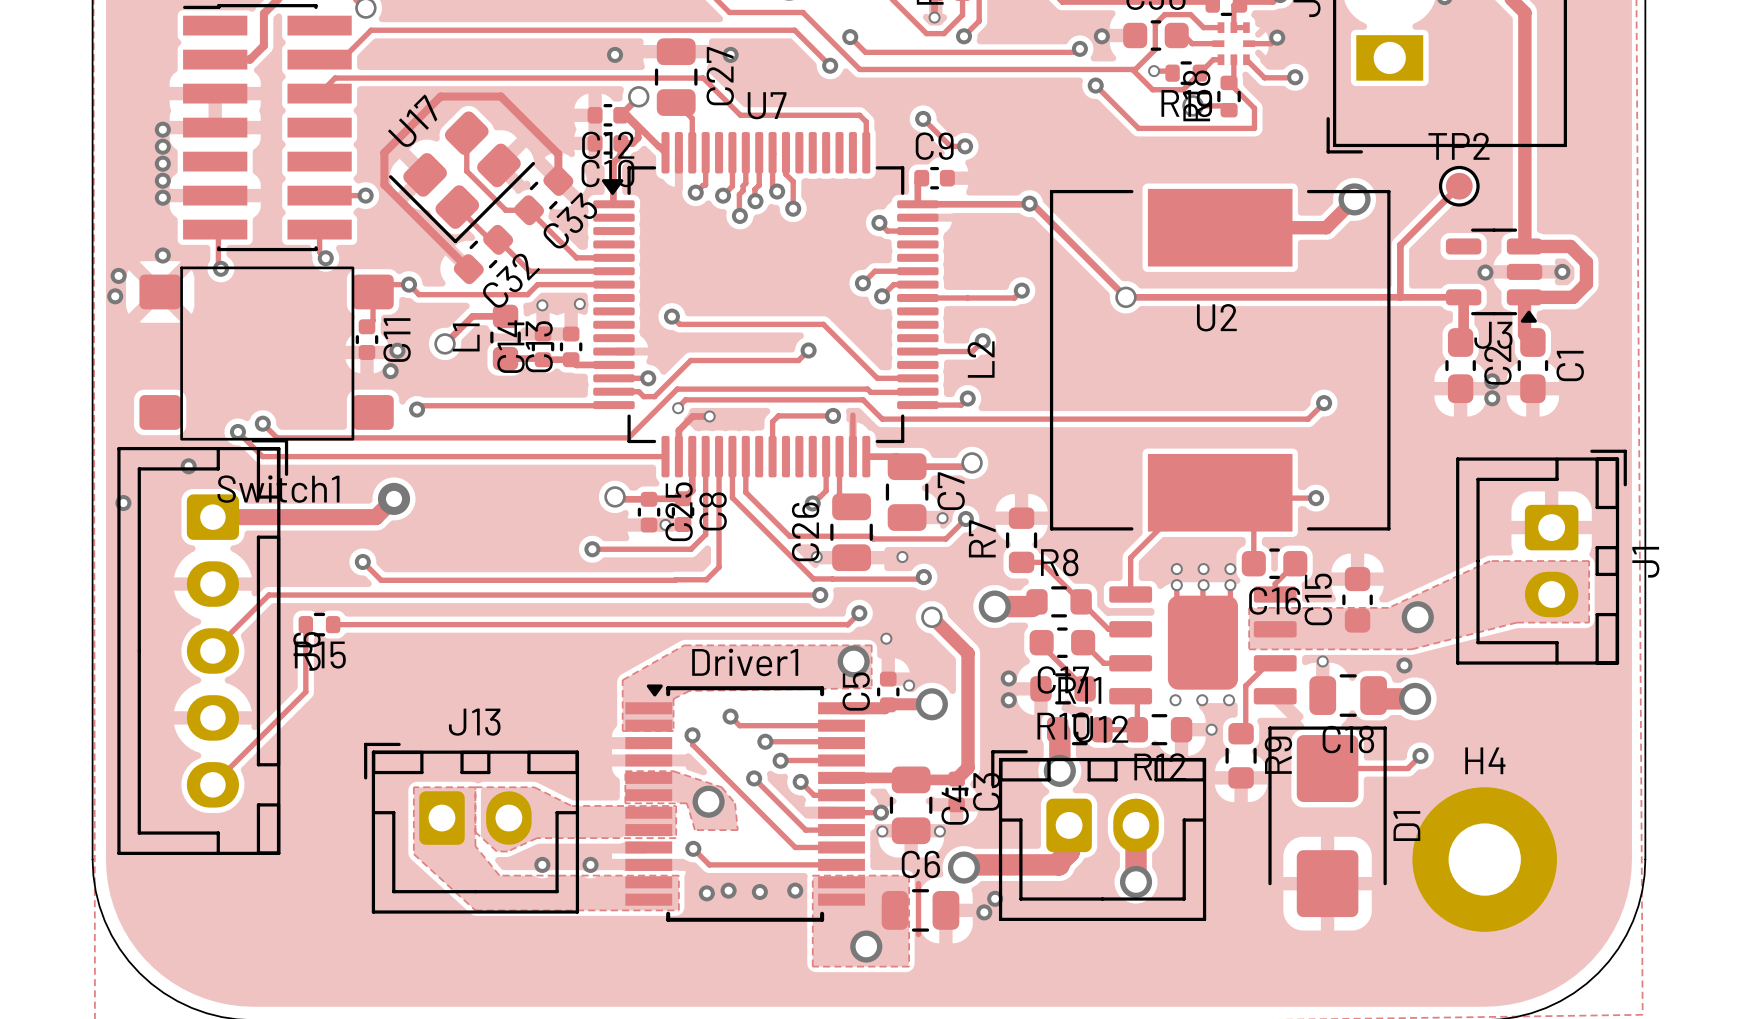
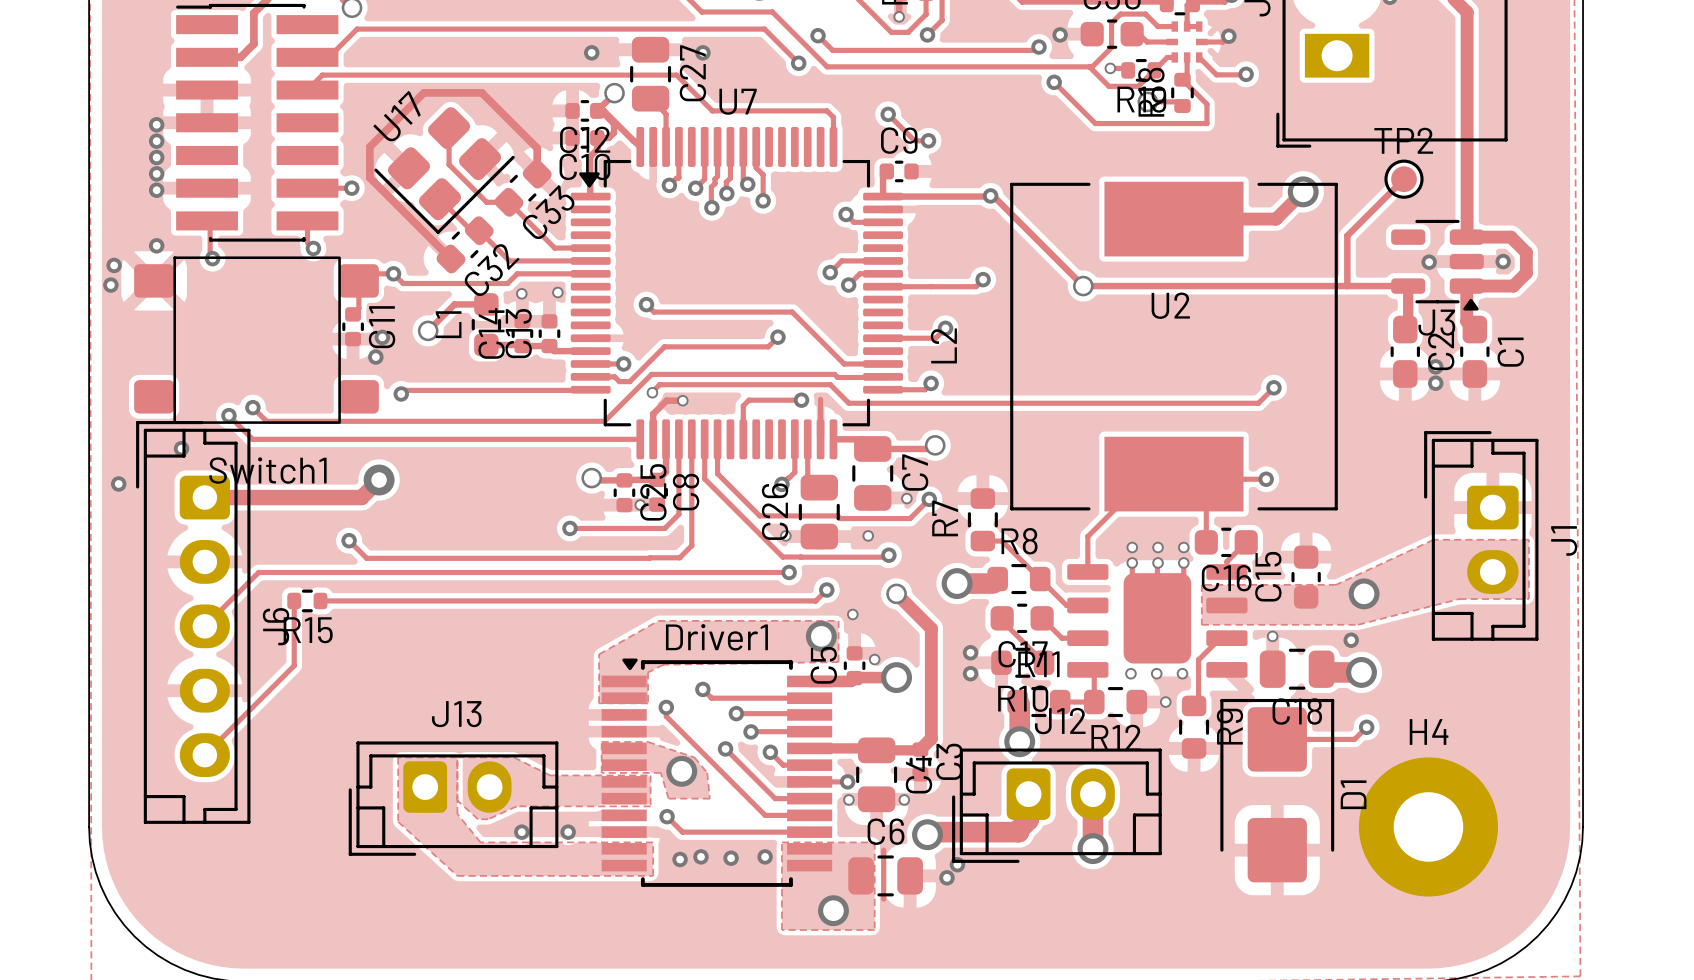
J6 footprint: [117, 439, 289, 855] -> [136, 421, 251, 824]
J1 footprint: [1456, 449, 1627, 665] -> [1424, 431, 1539, 641]
J13 footprint: [364, 742, 580, 914] -> [348, 741, 559, 856]
J12 footprint: [991, 750, 1207, 921] -> [952, 748, 1162, 863]

